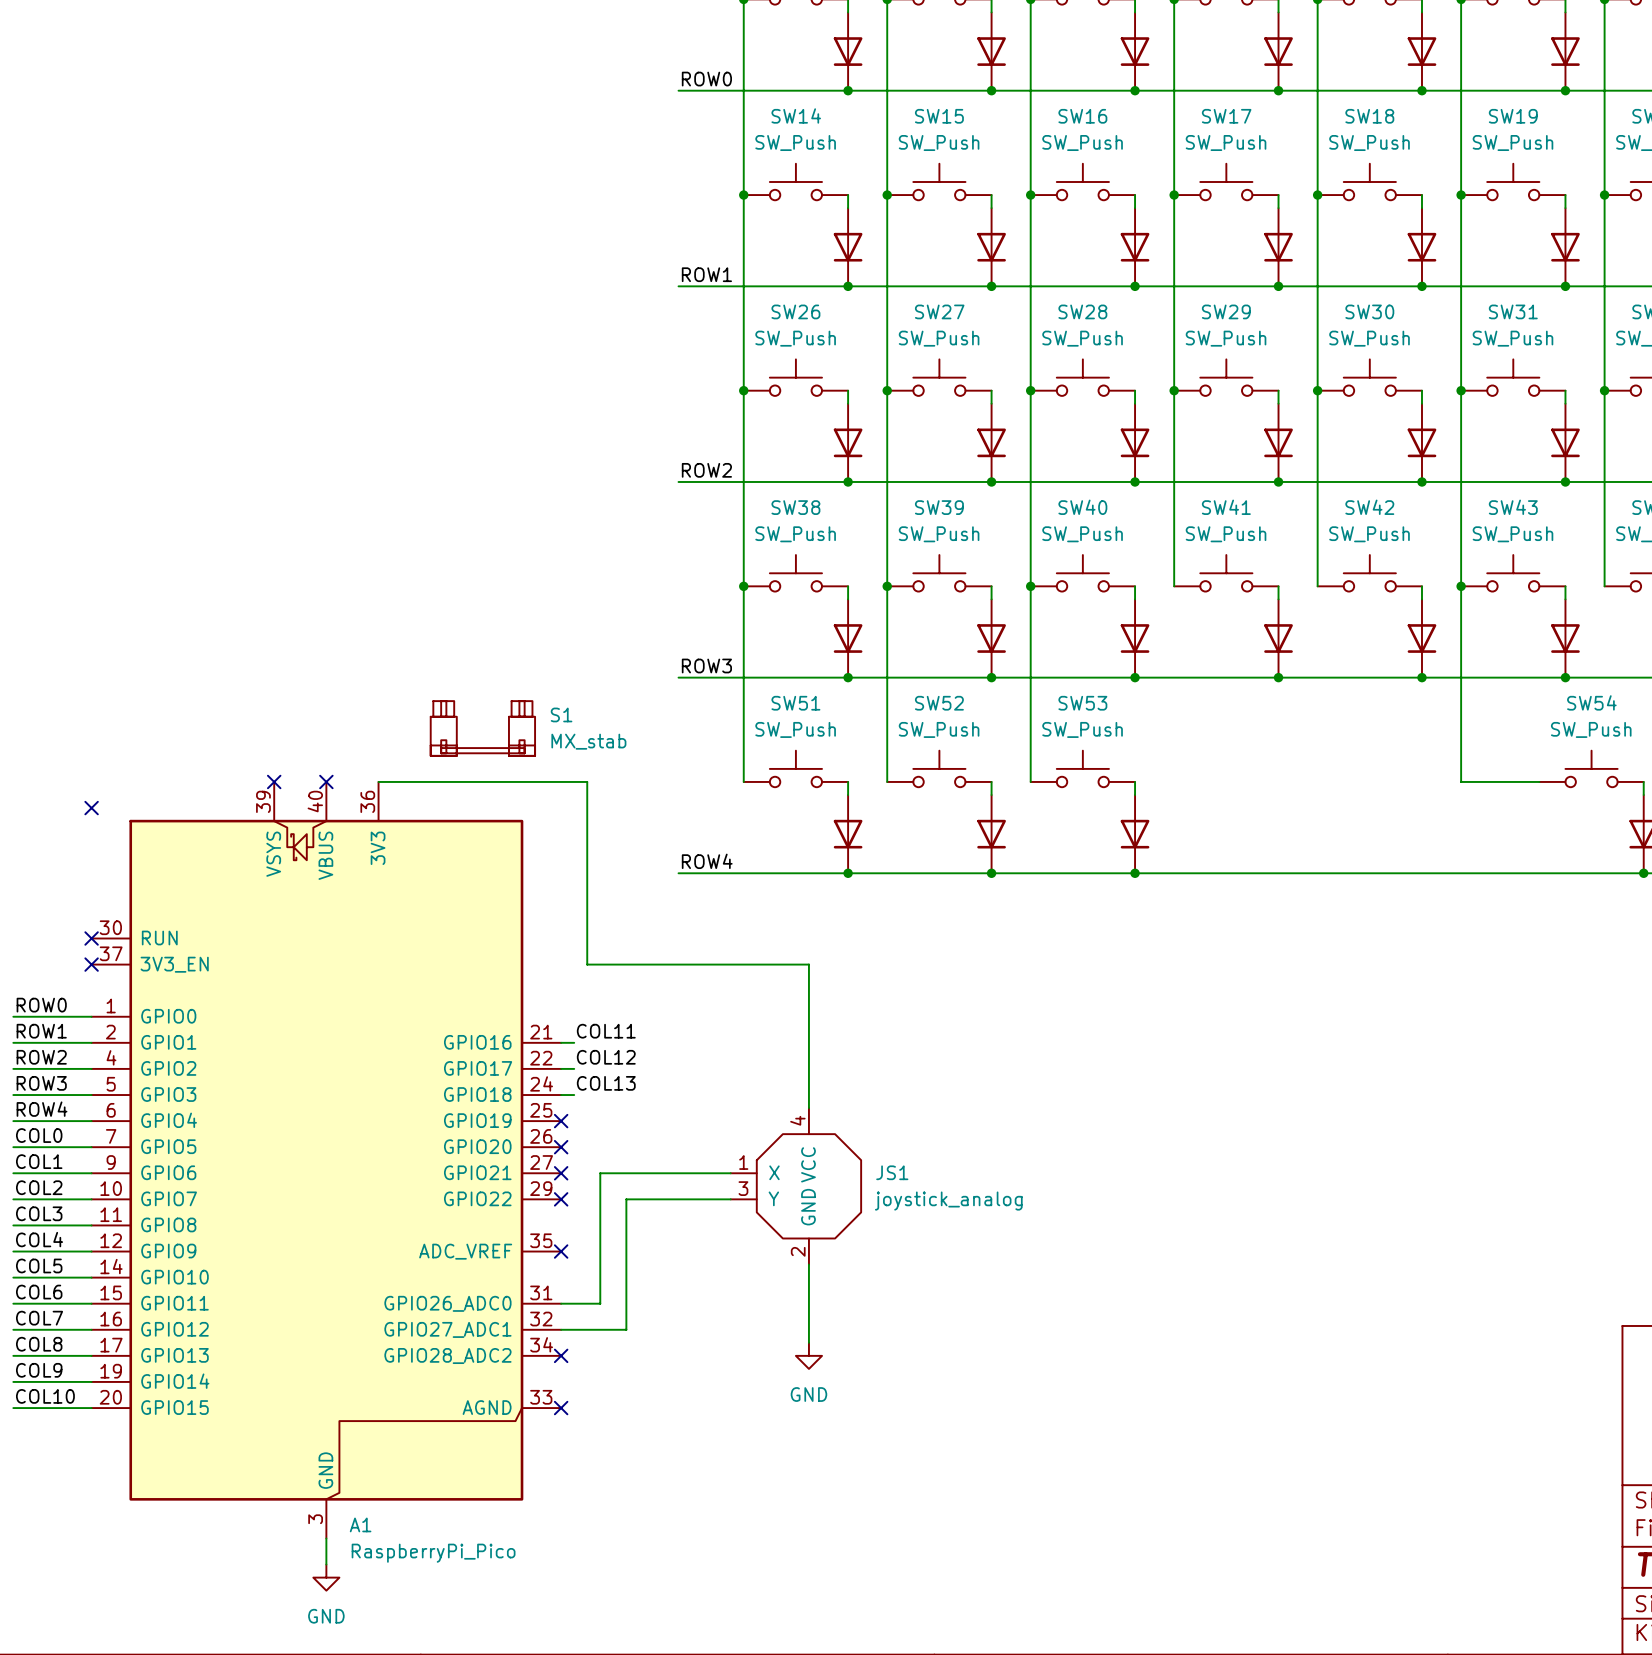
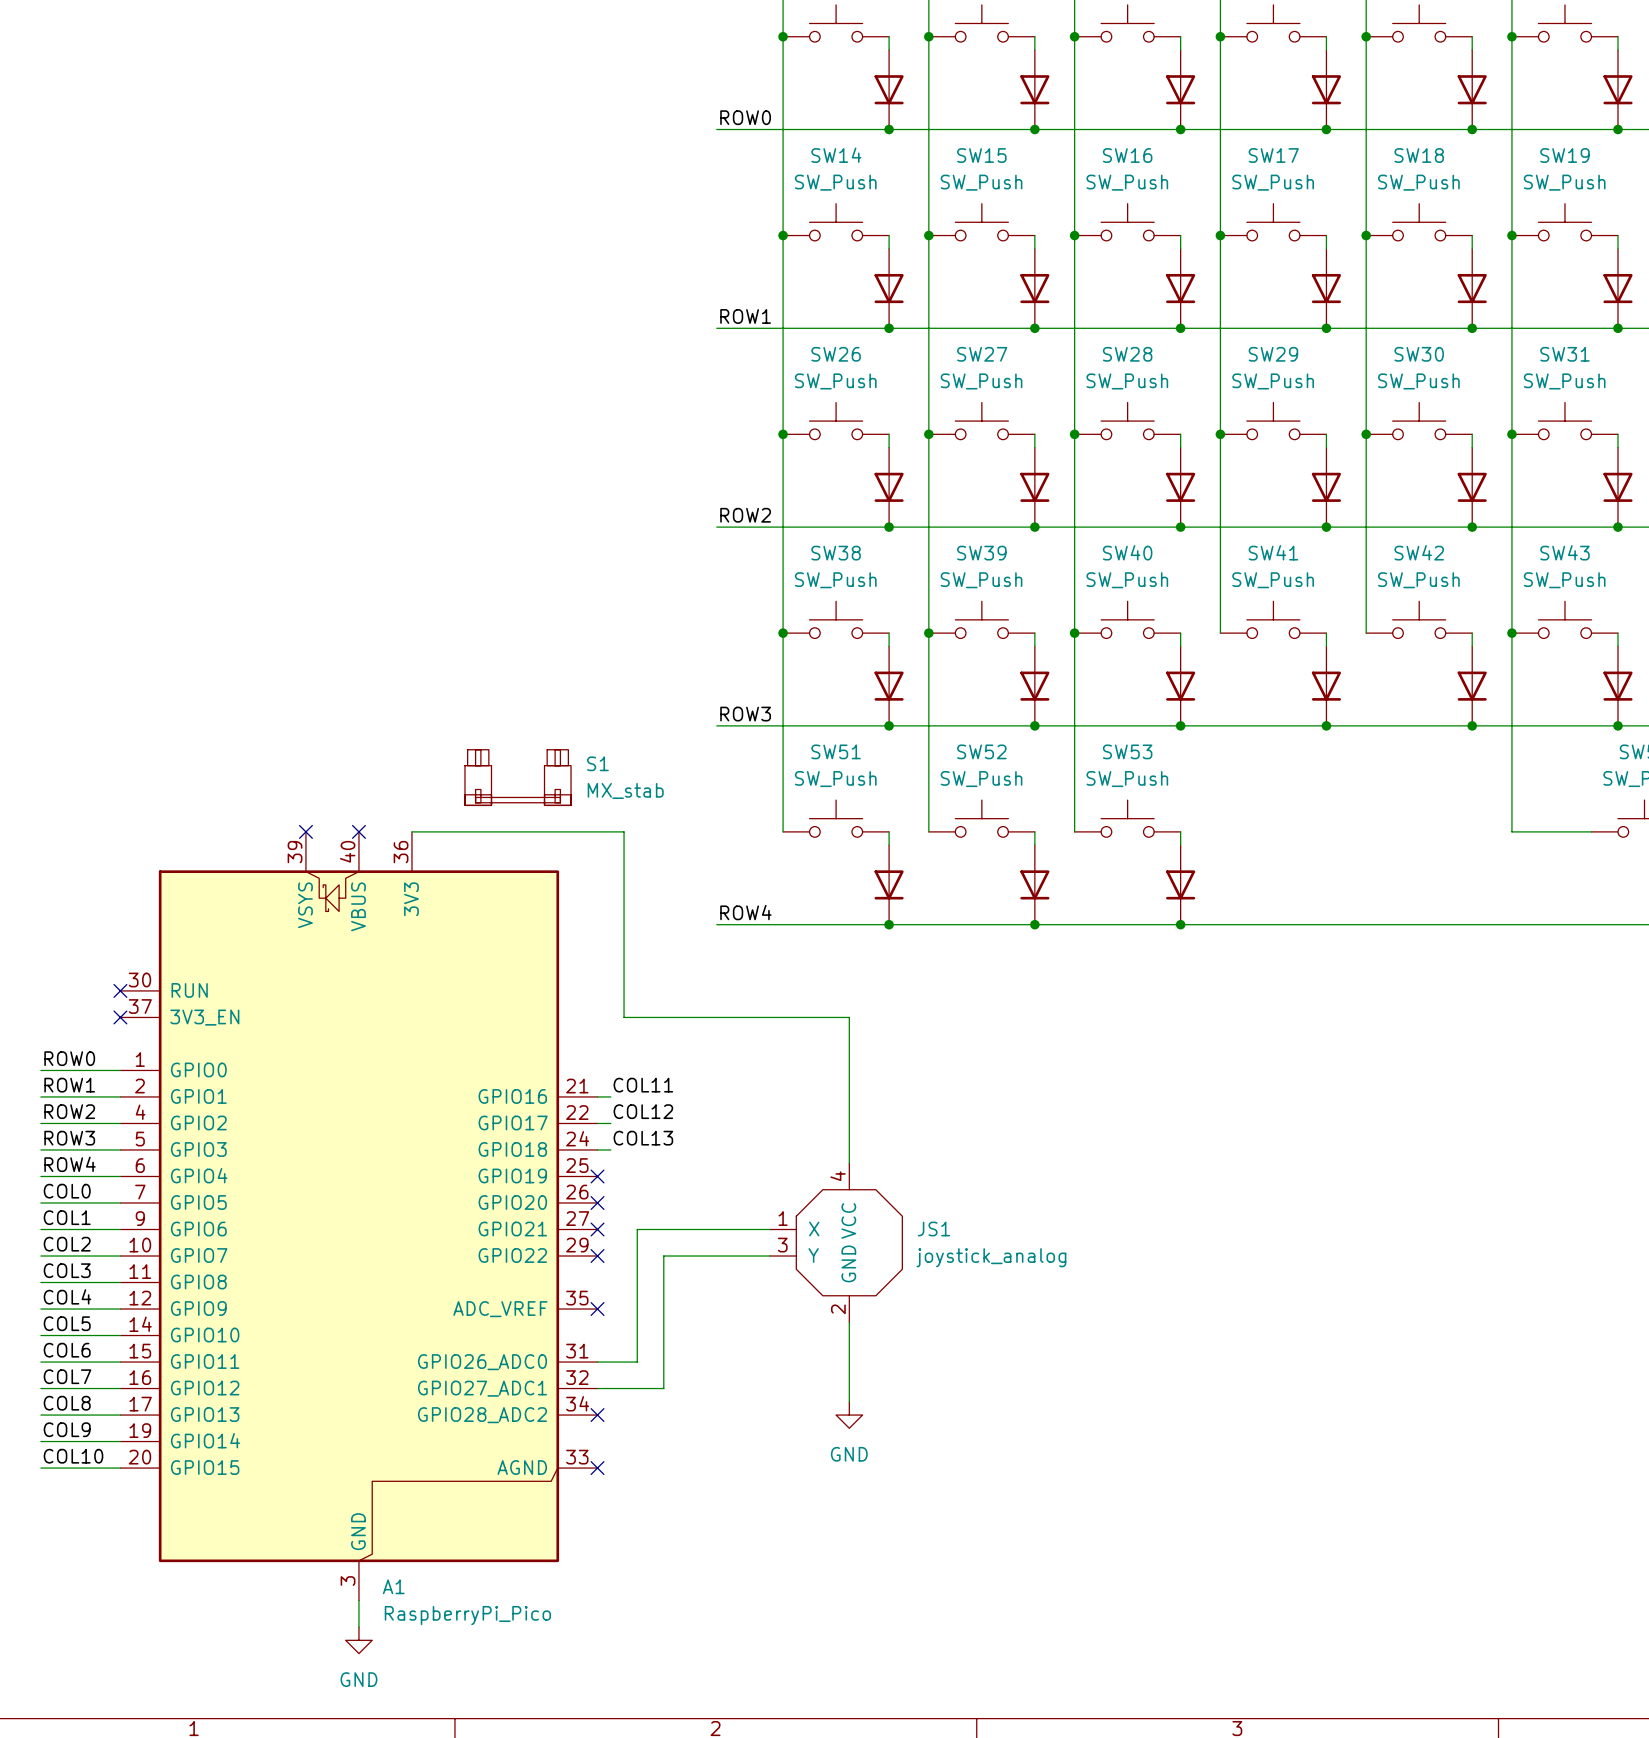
no-connect mark: (91, 808) -> none

